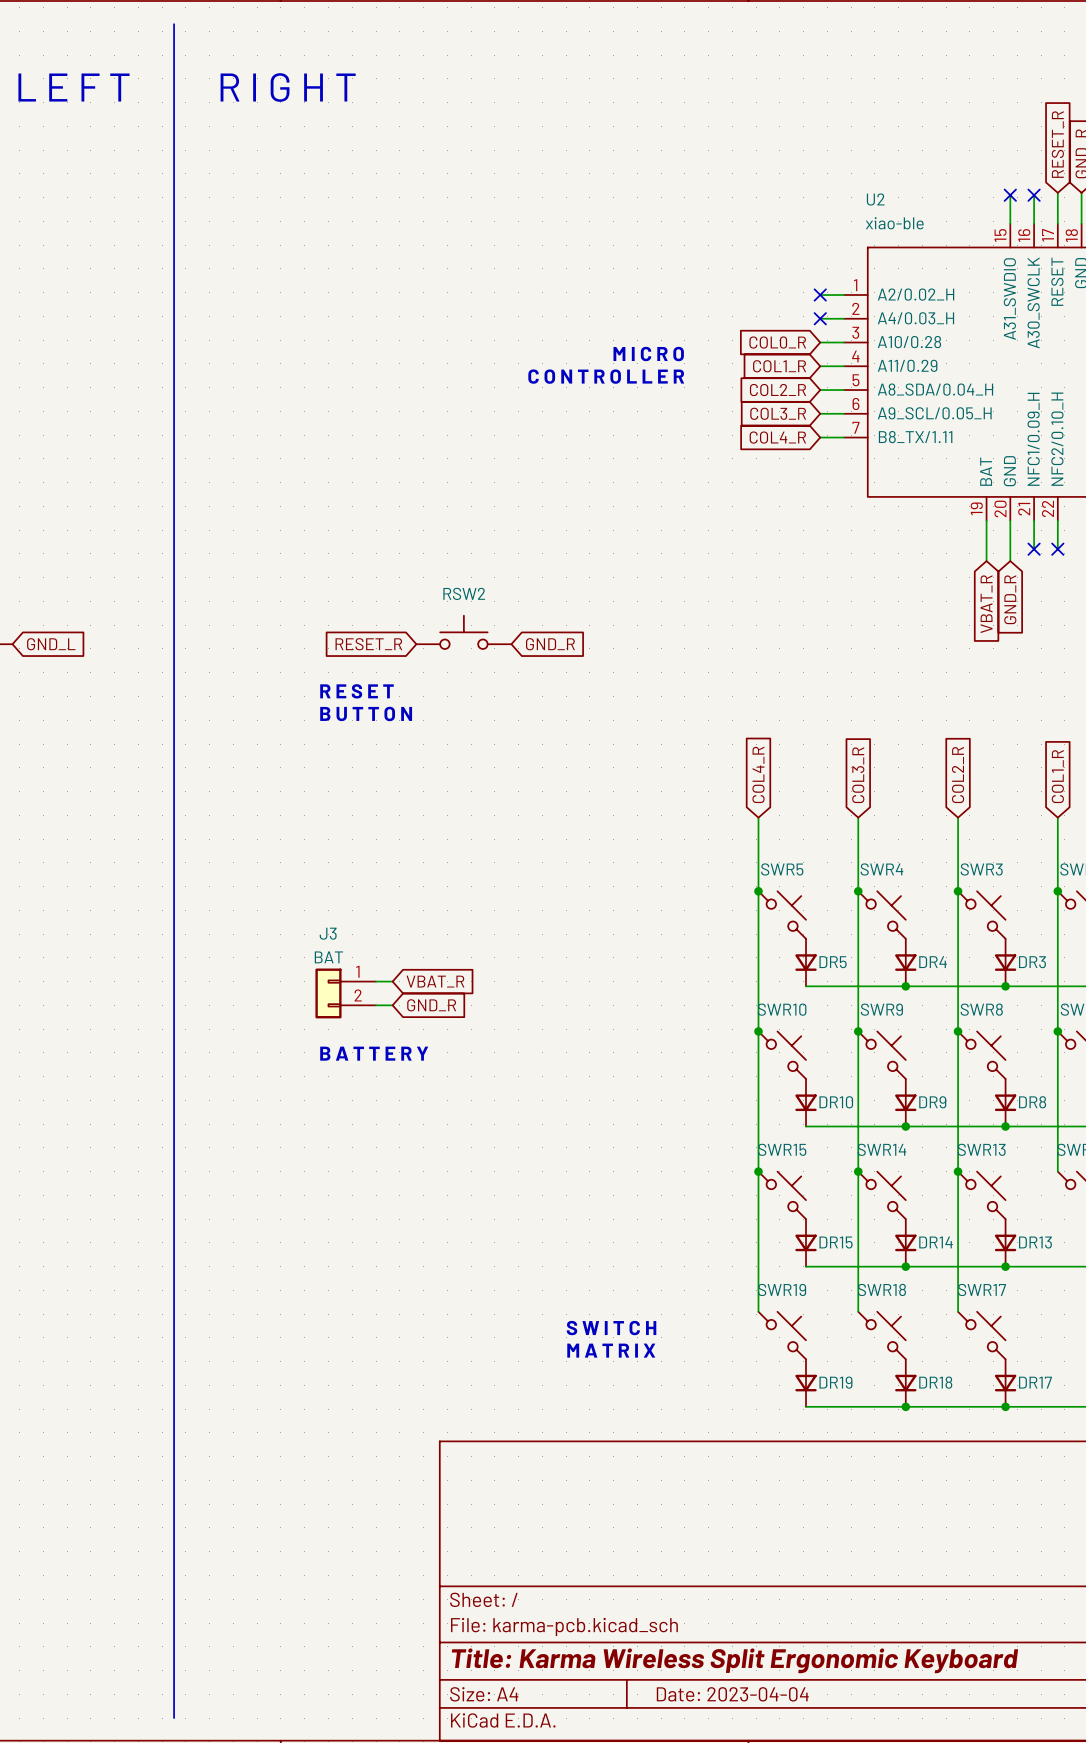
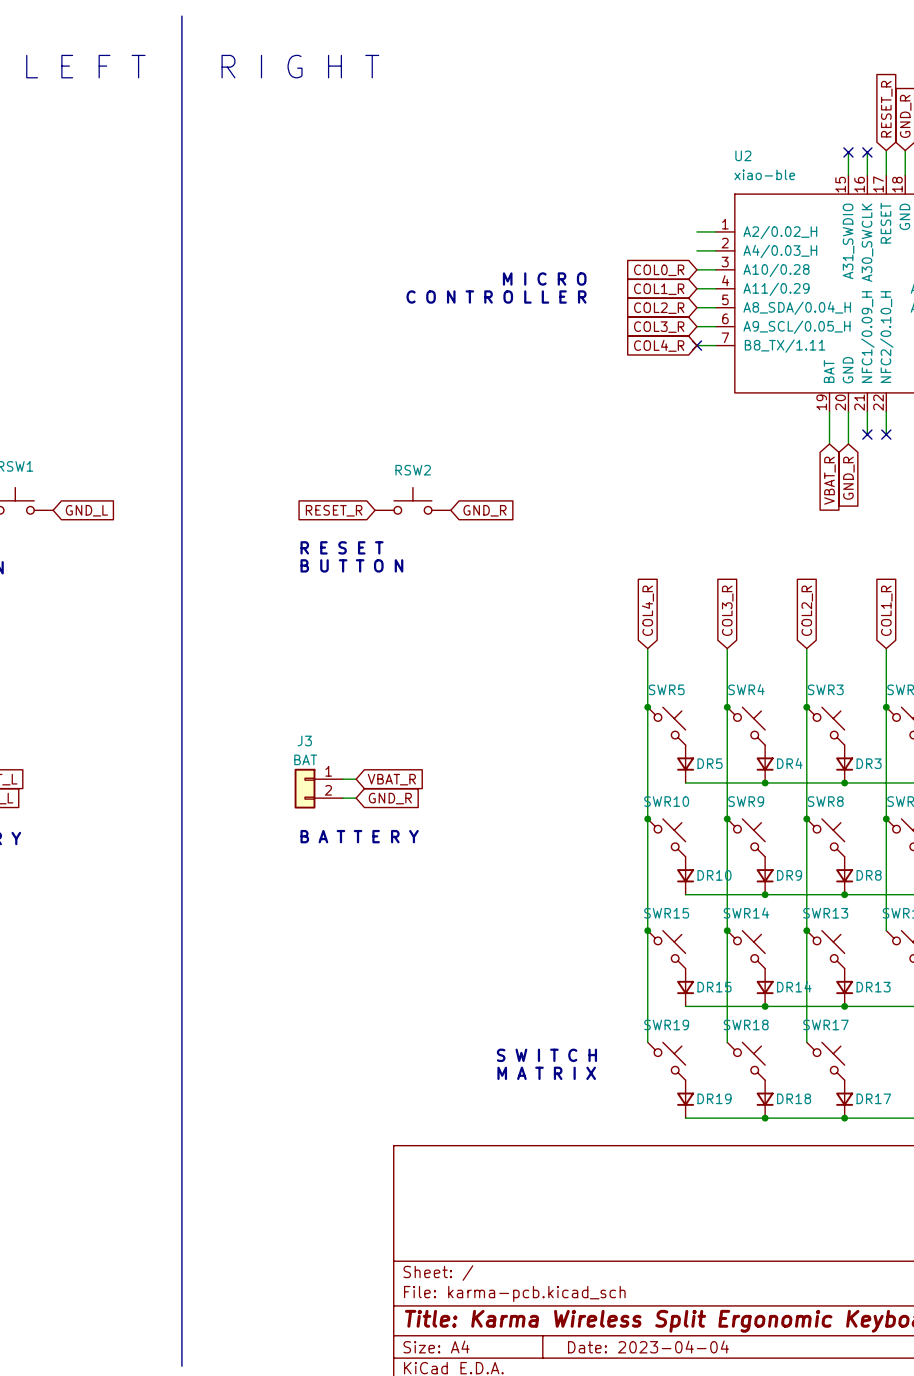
no-connect mark: (820, 295) -> none
no-connect mark: (820, 318) -> none
no-connect mark: none -> (696, 345)

